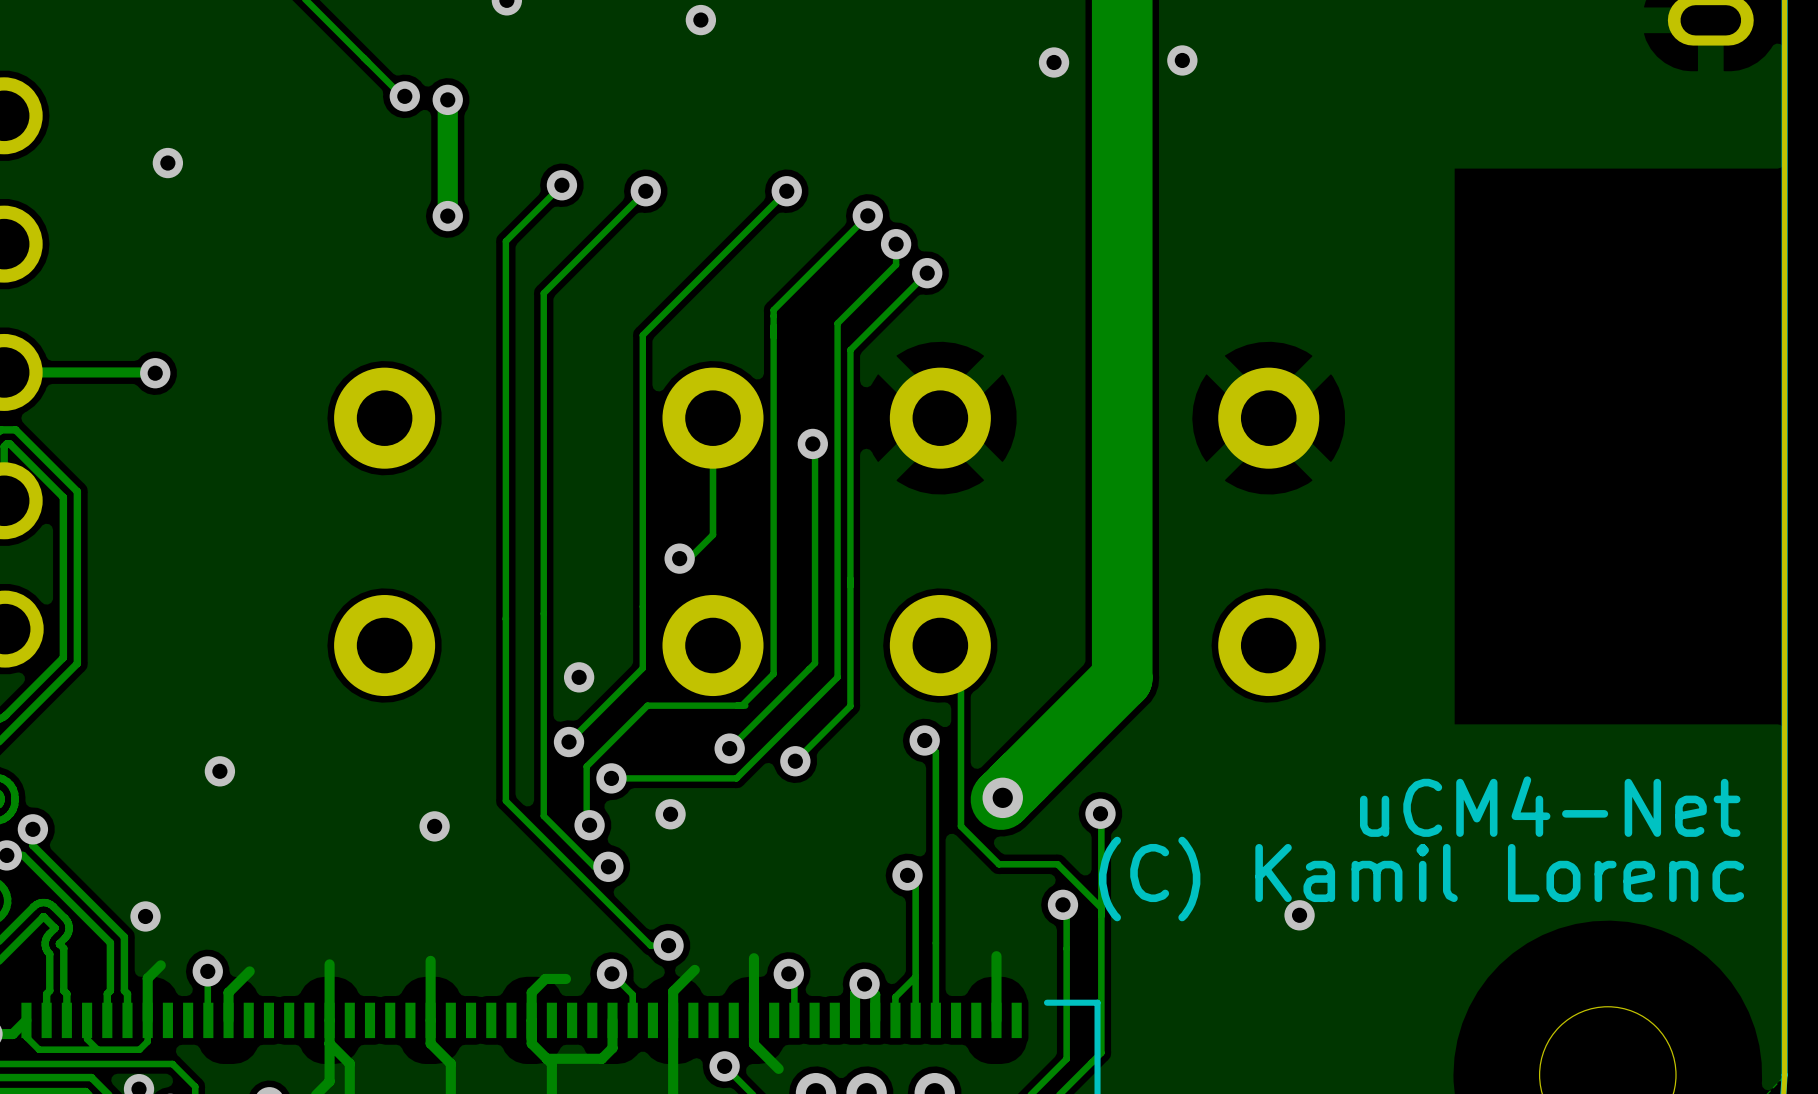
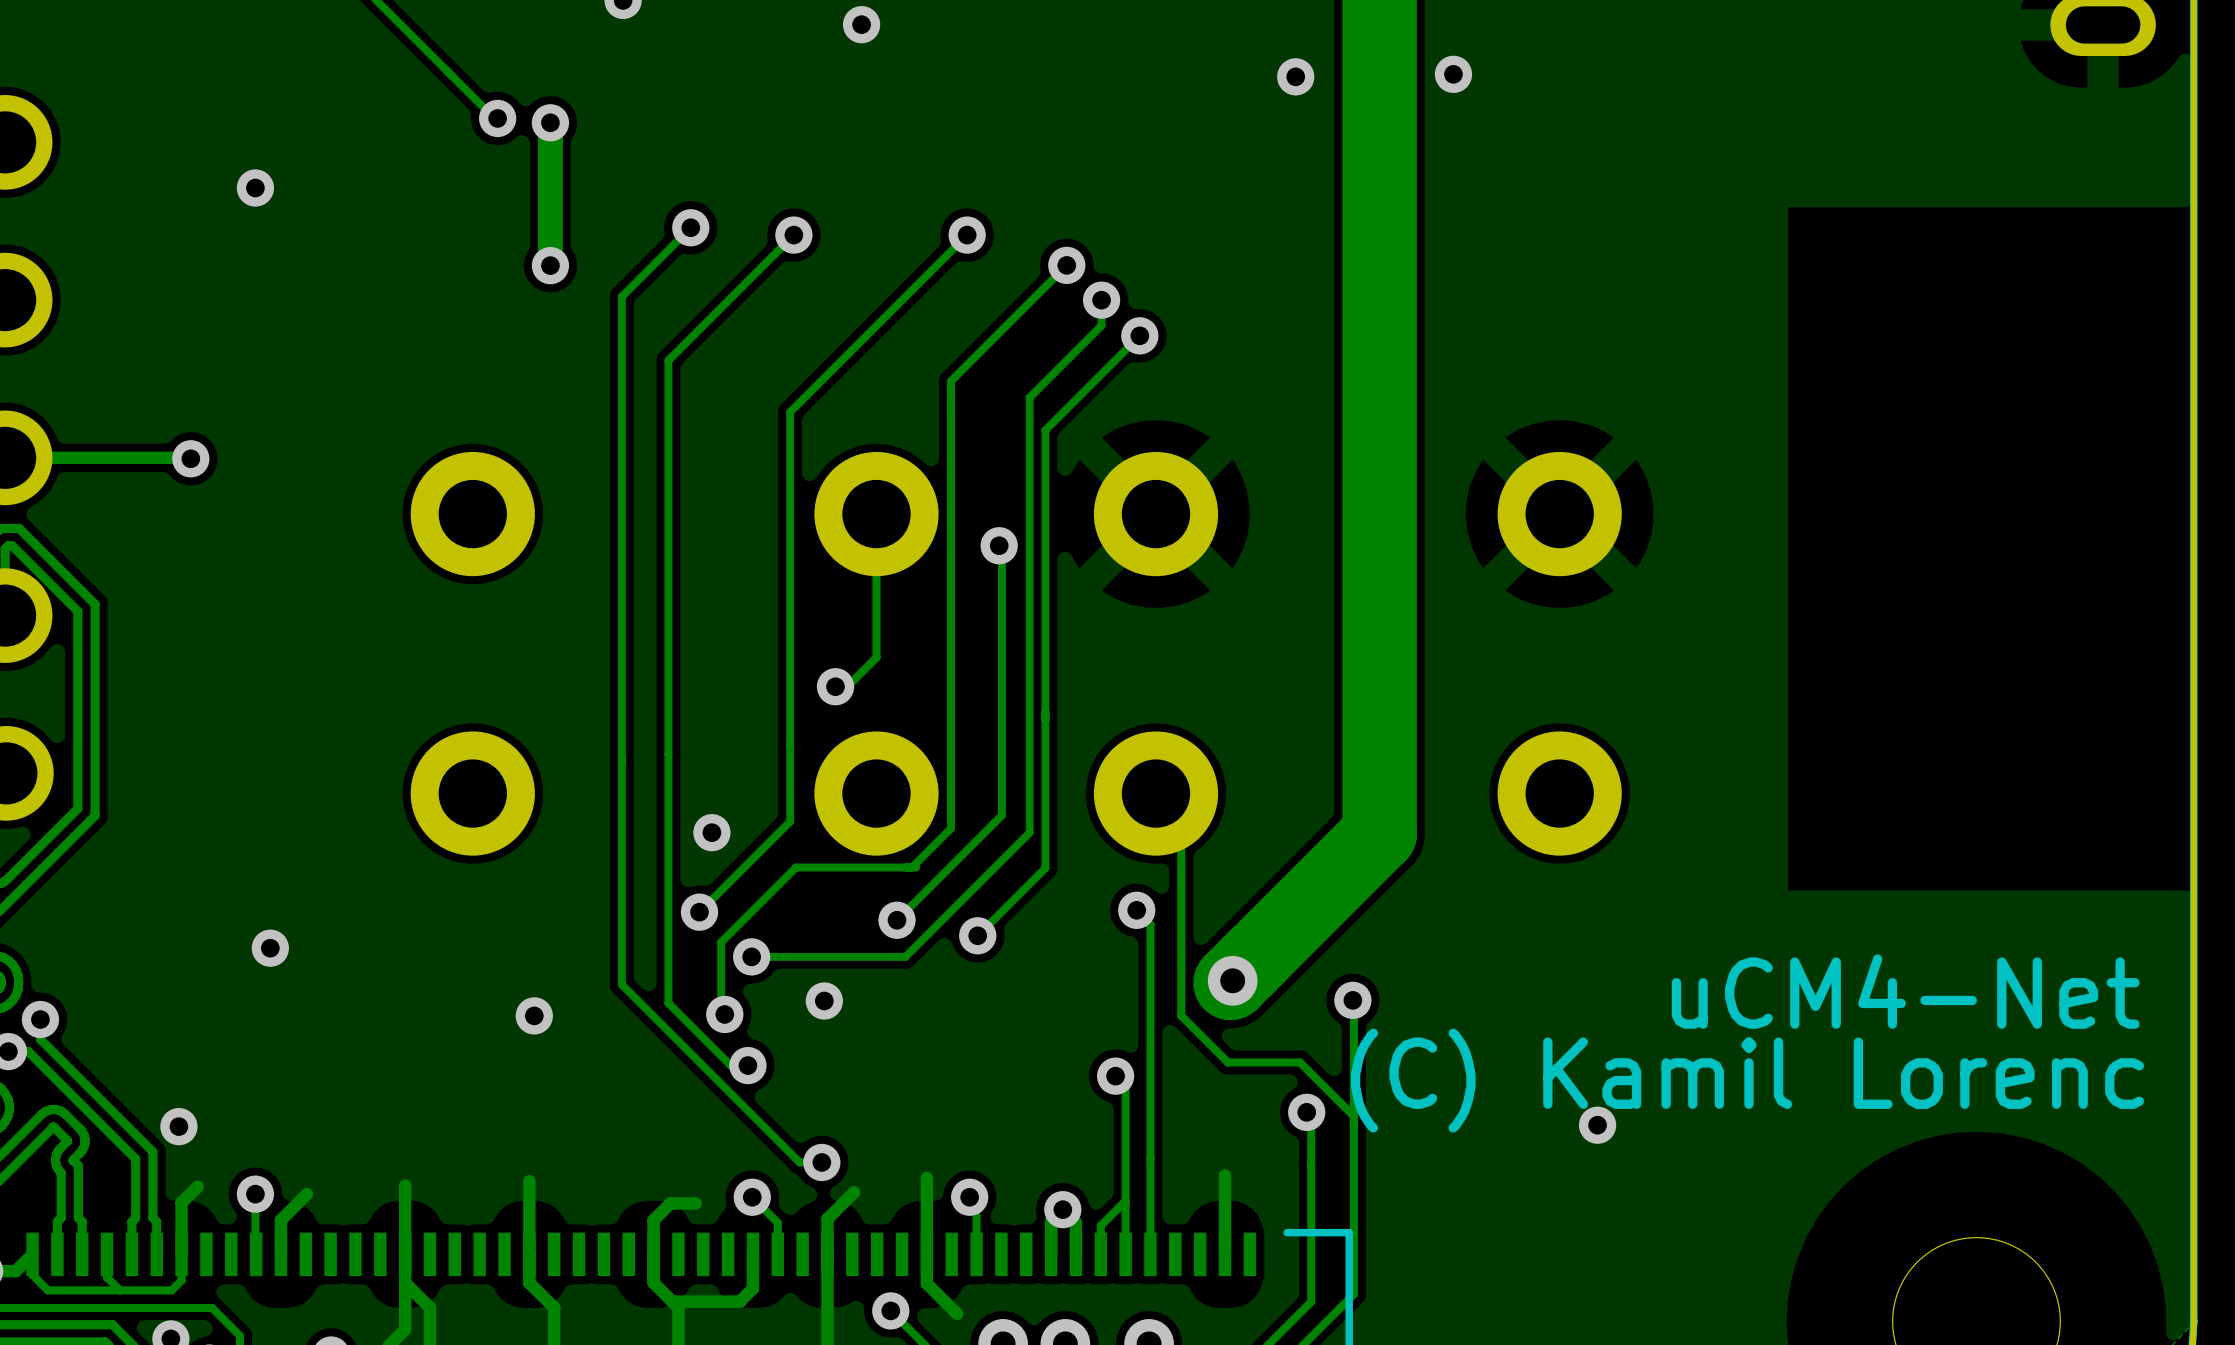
via position: (167, 163) -> (255, 188)

